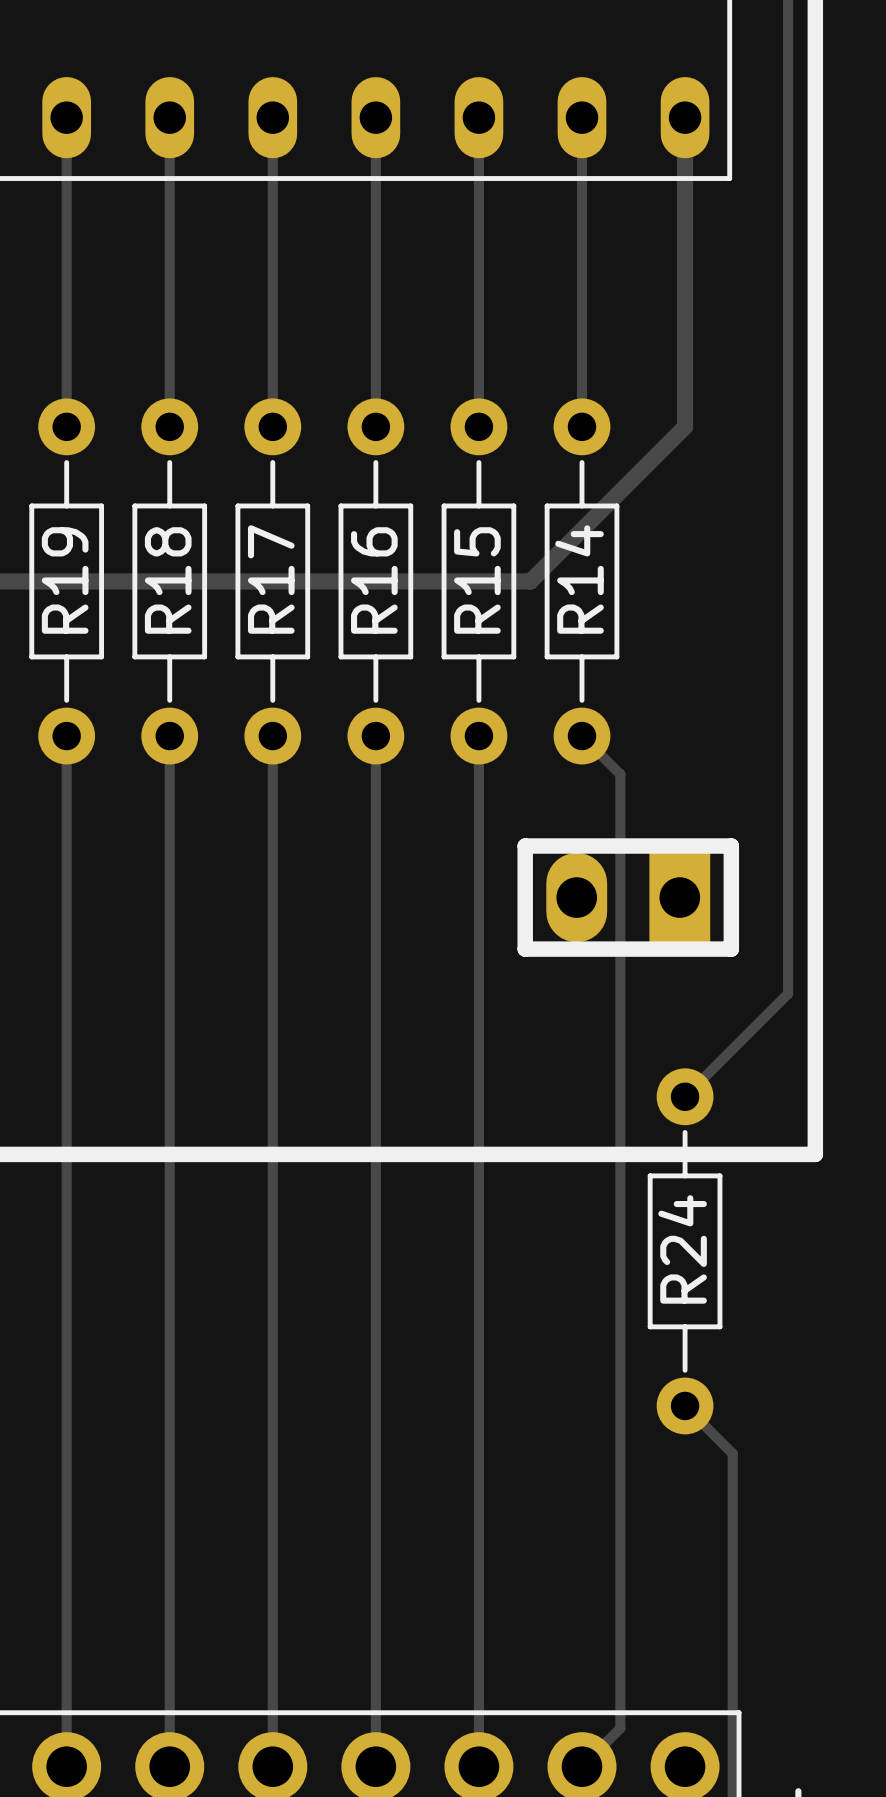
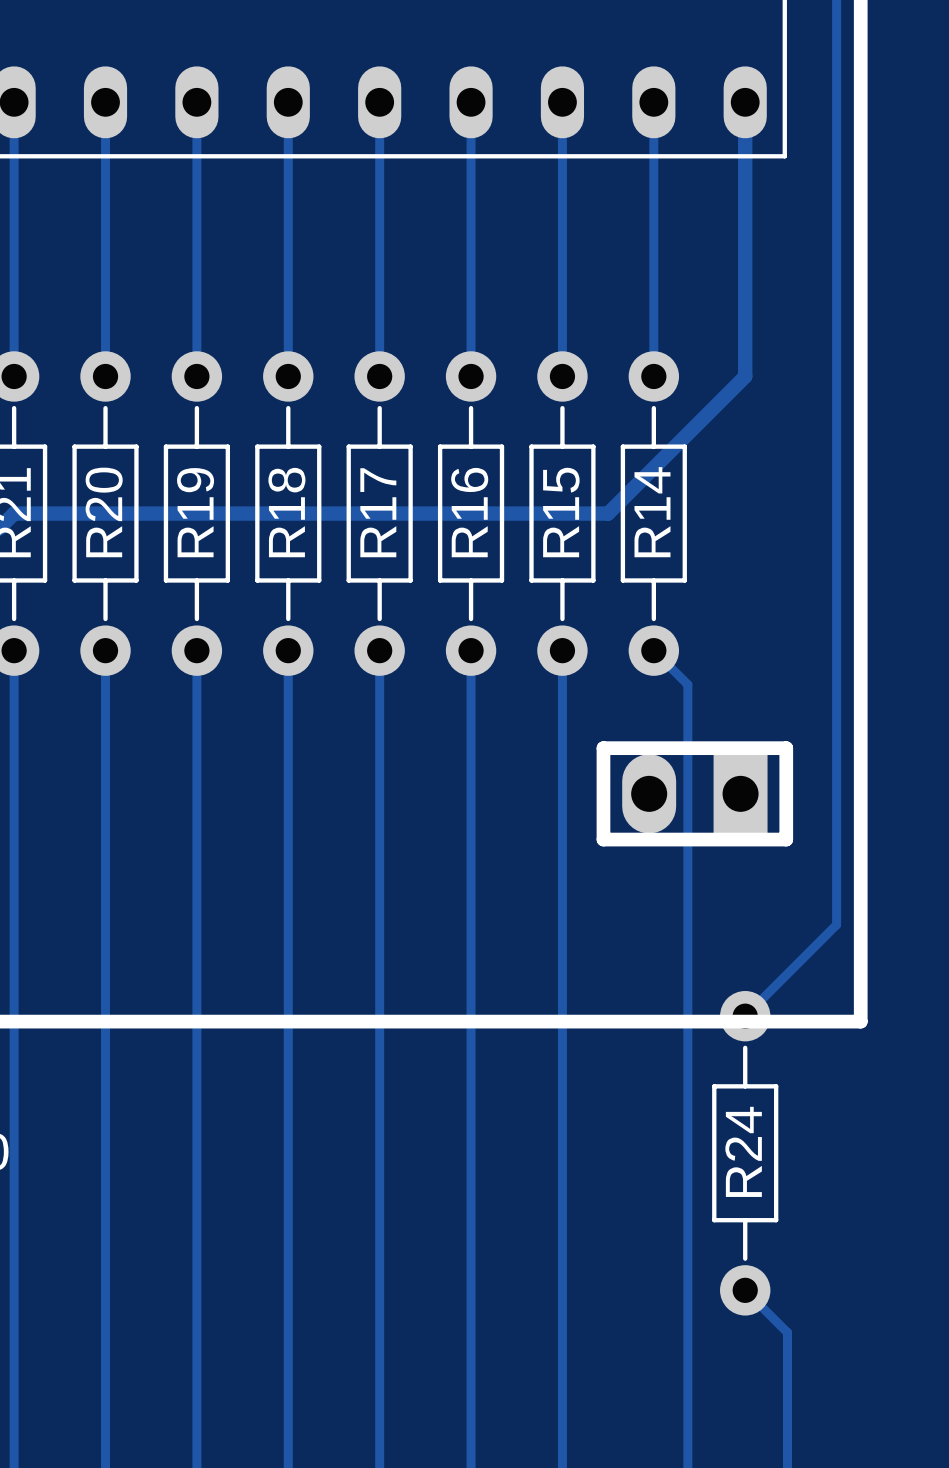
track: (788, 993) (685, 1096) -> (836, 879) (836, 924) (745, 1016)
R24 position: (685, 1251) -> (745, 1153)
track: (685, 1405) (732, 1453) (732, 1505) -> (745, 1290) (787, 1332)

